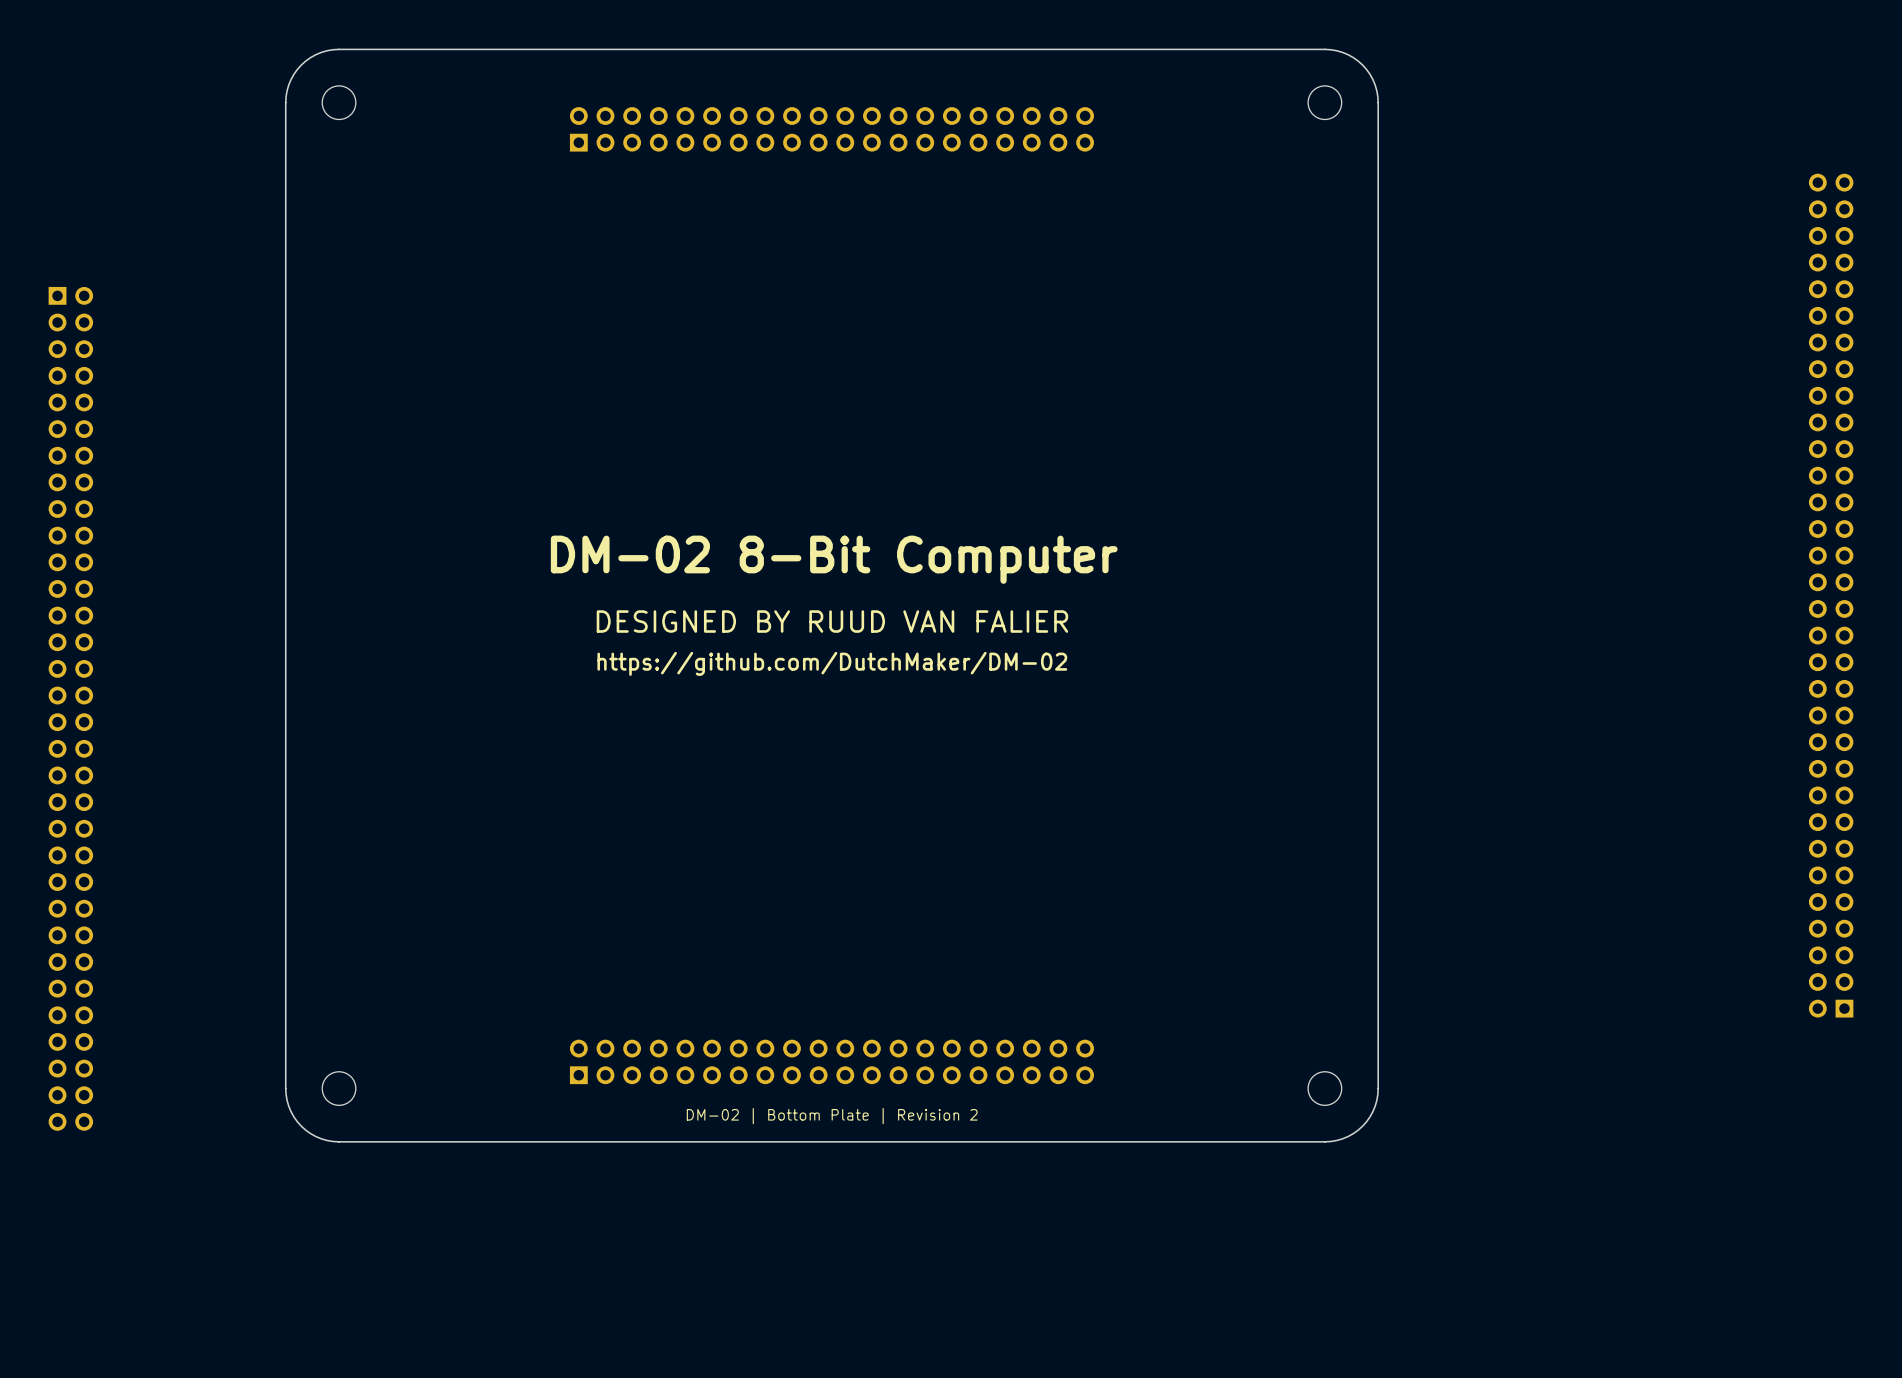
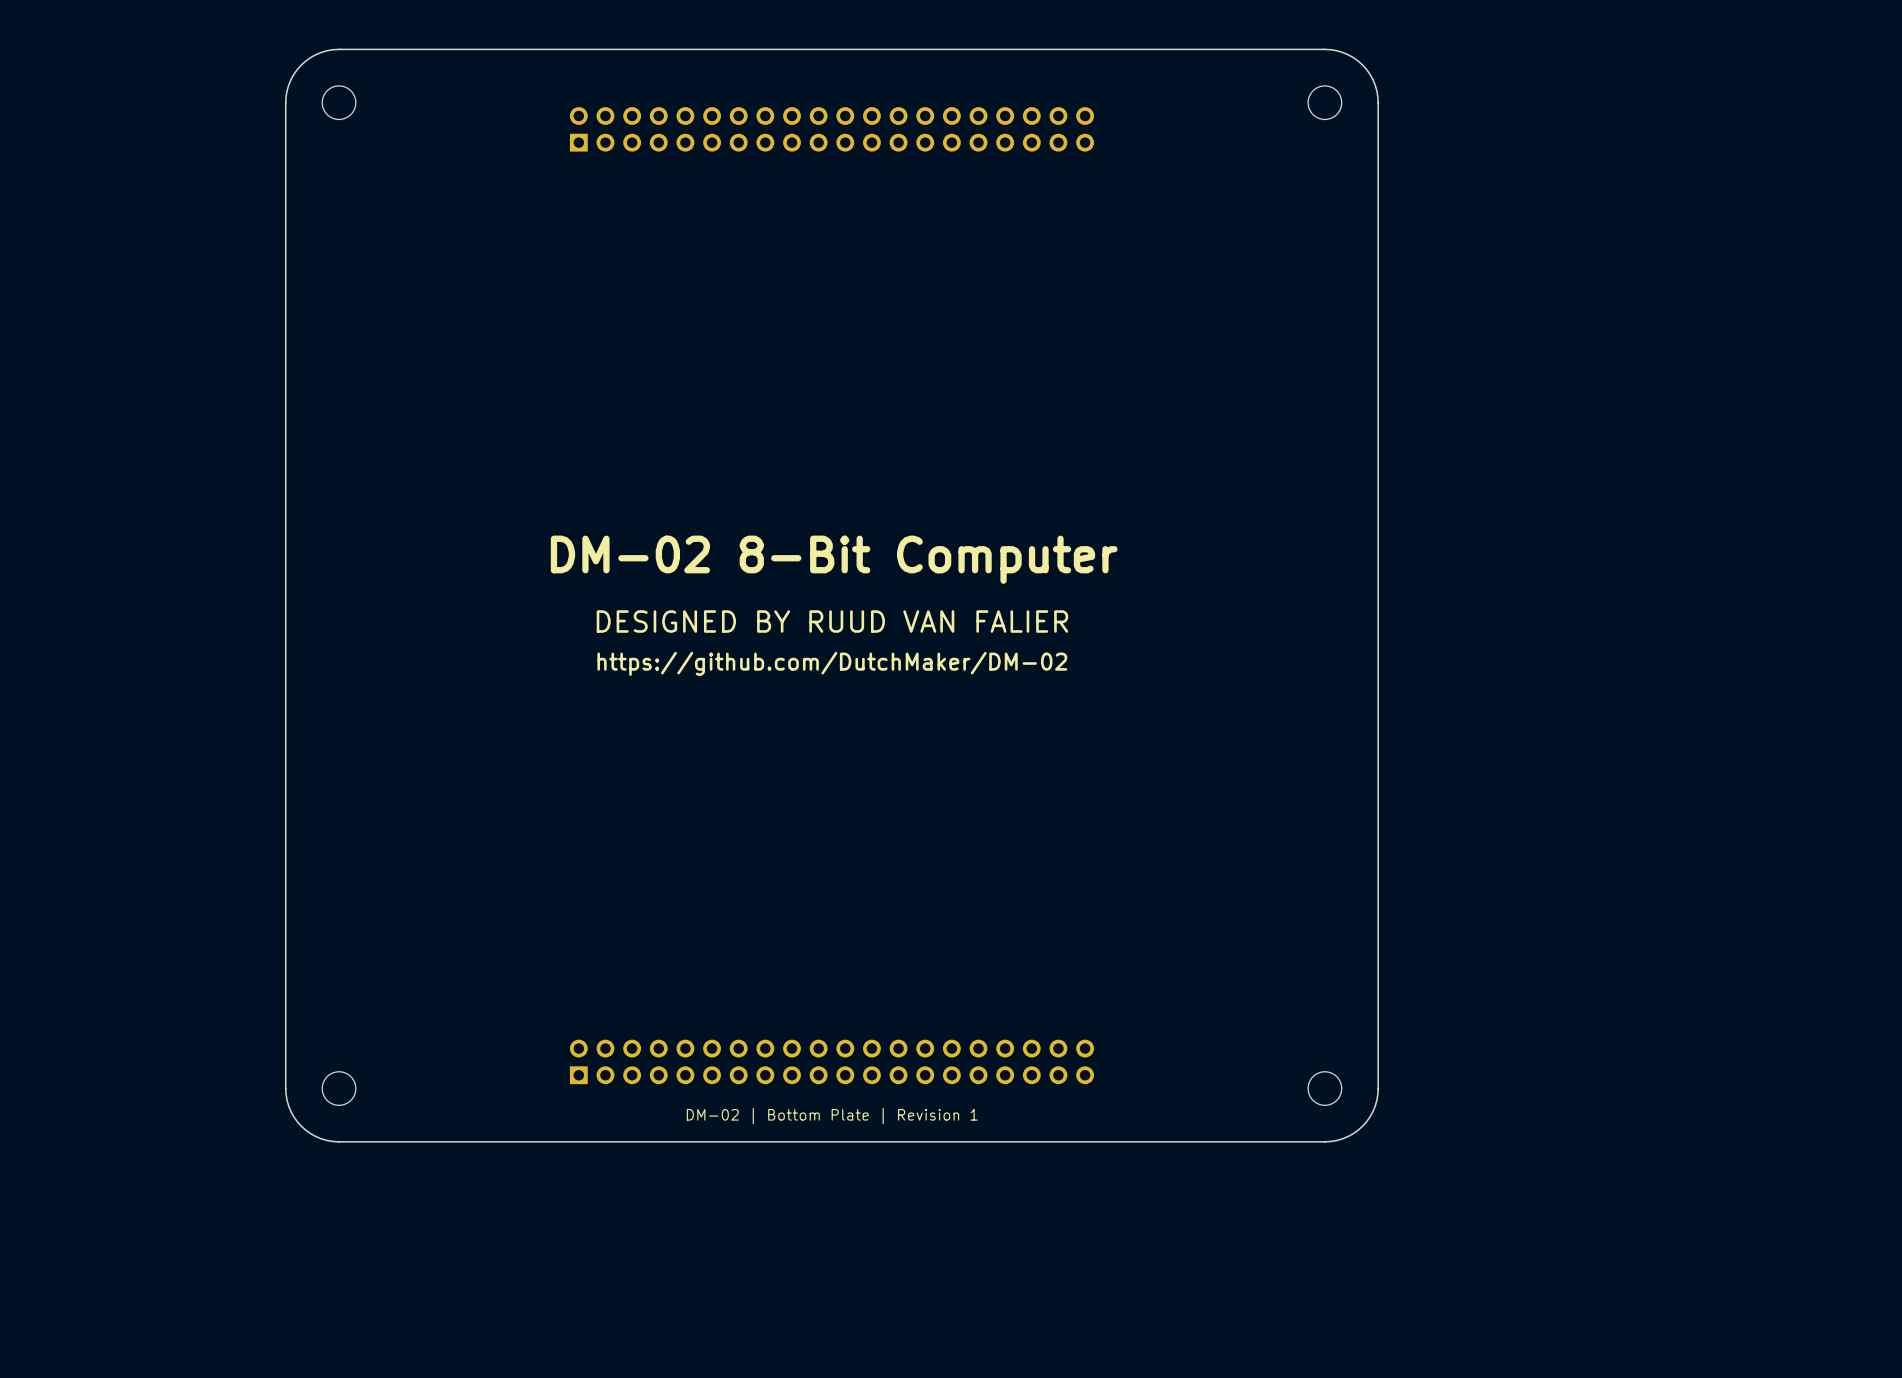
part: (1831, 595) -> none
part: (70, 708) -> none
text: DM-02 | Bottom Plate | Revision 2 (832, 1116) -> DM-02 | Bottom Plate | Revision 1 (832, 1116)

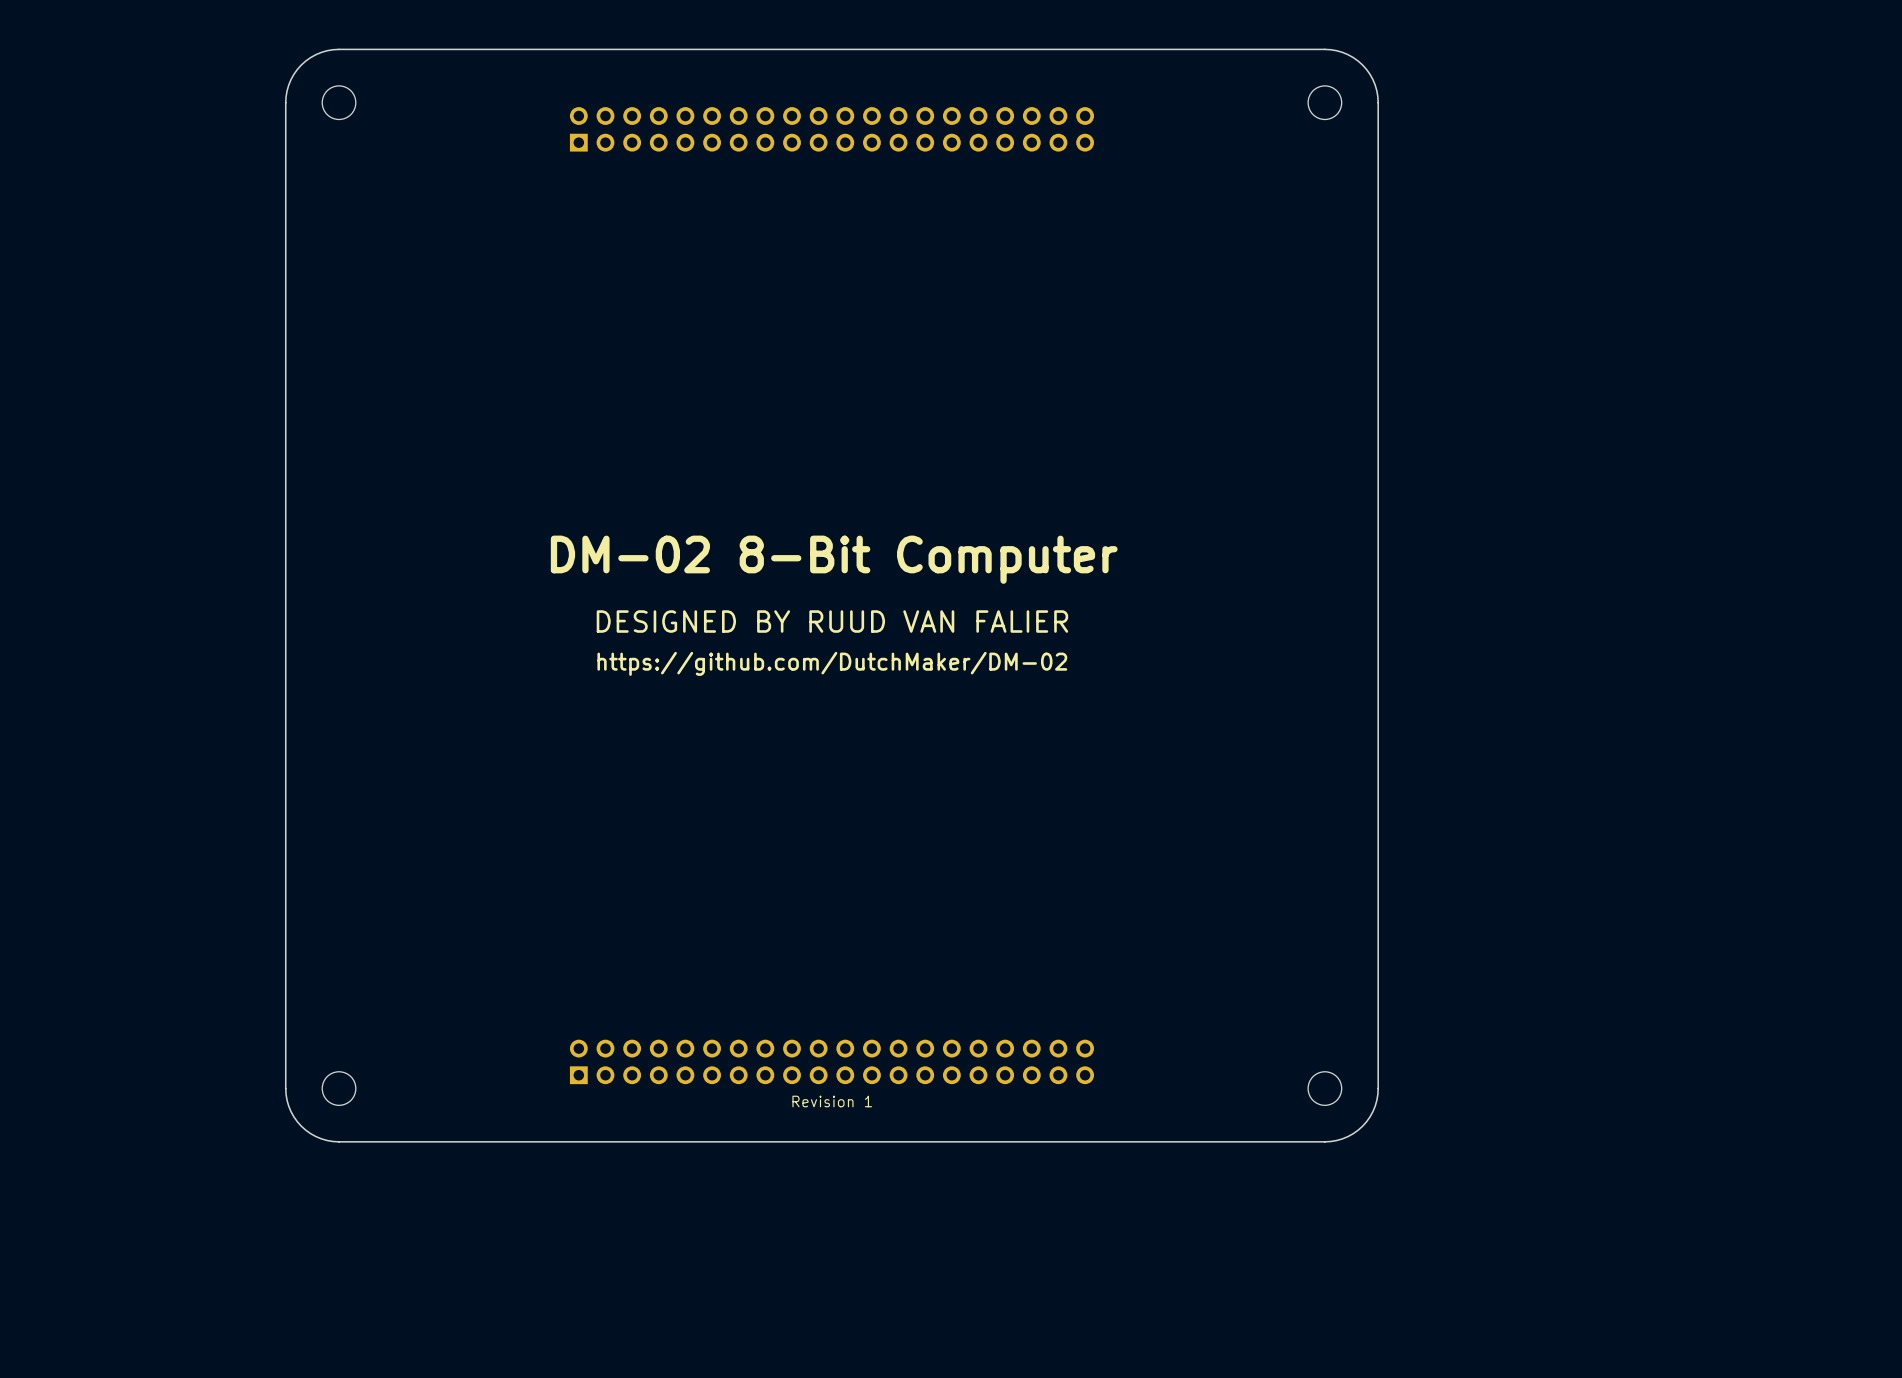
text: none -> Revision 1 (832, 1101)
text: DM-02 | Bottom Plate | Revision 1 (832, 1116) -> none

